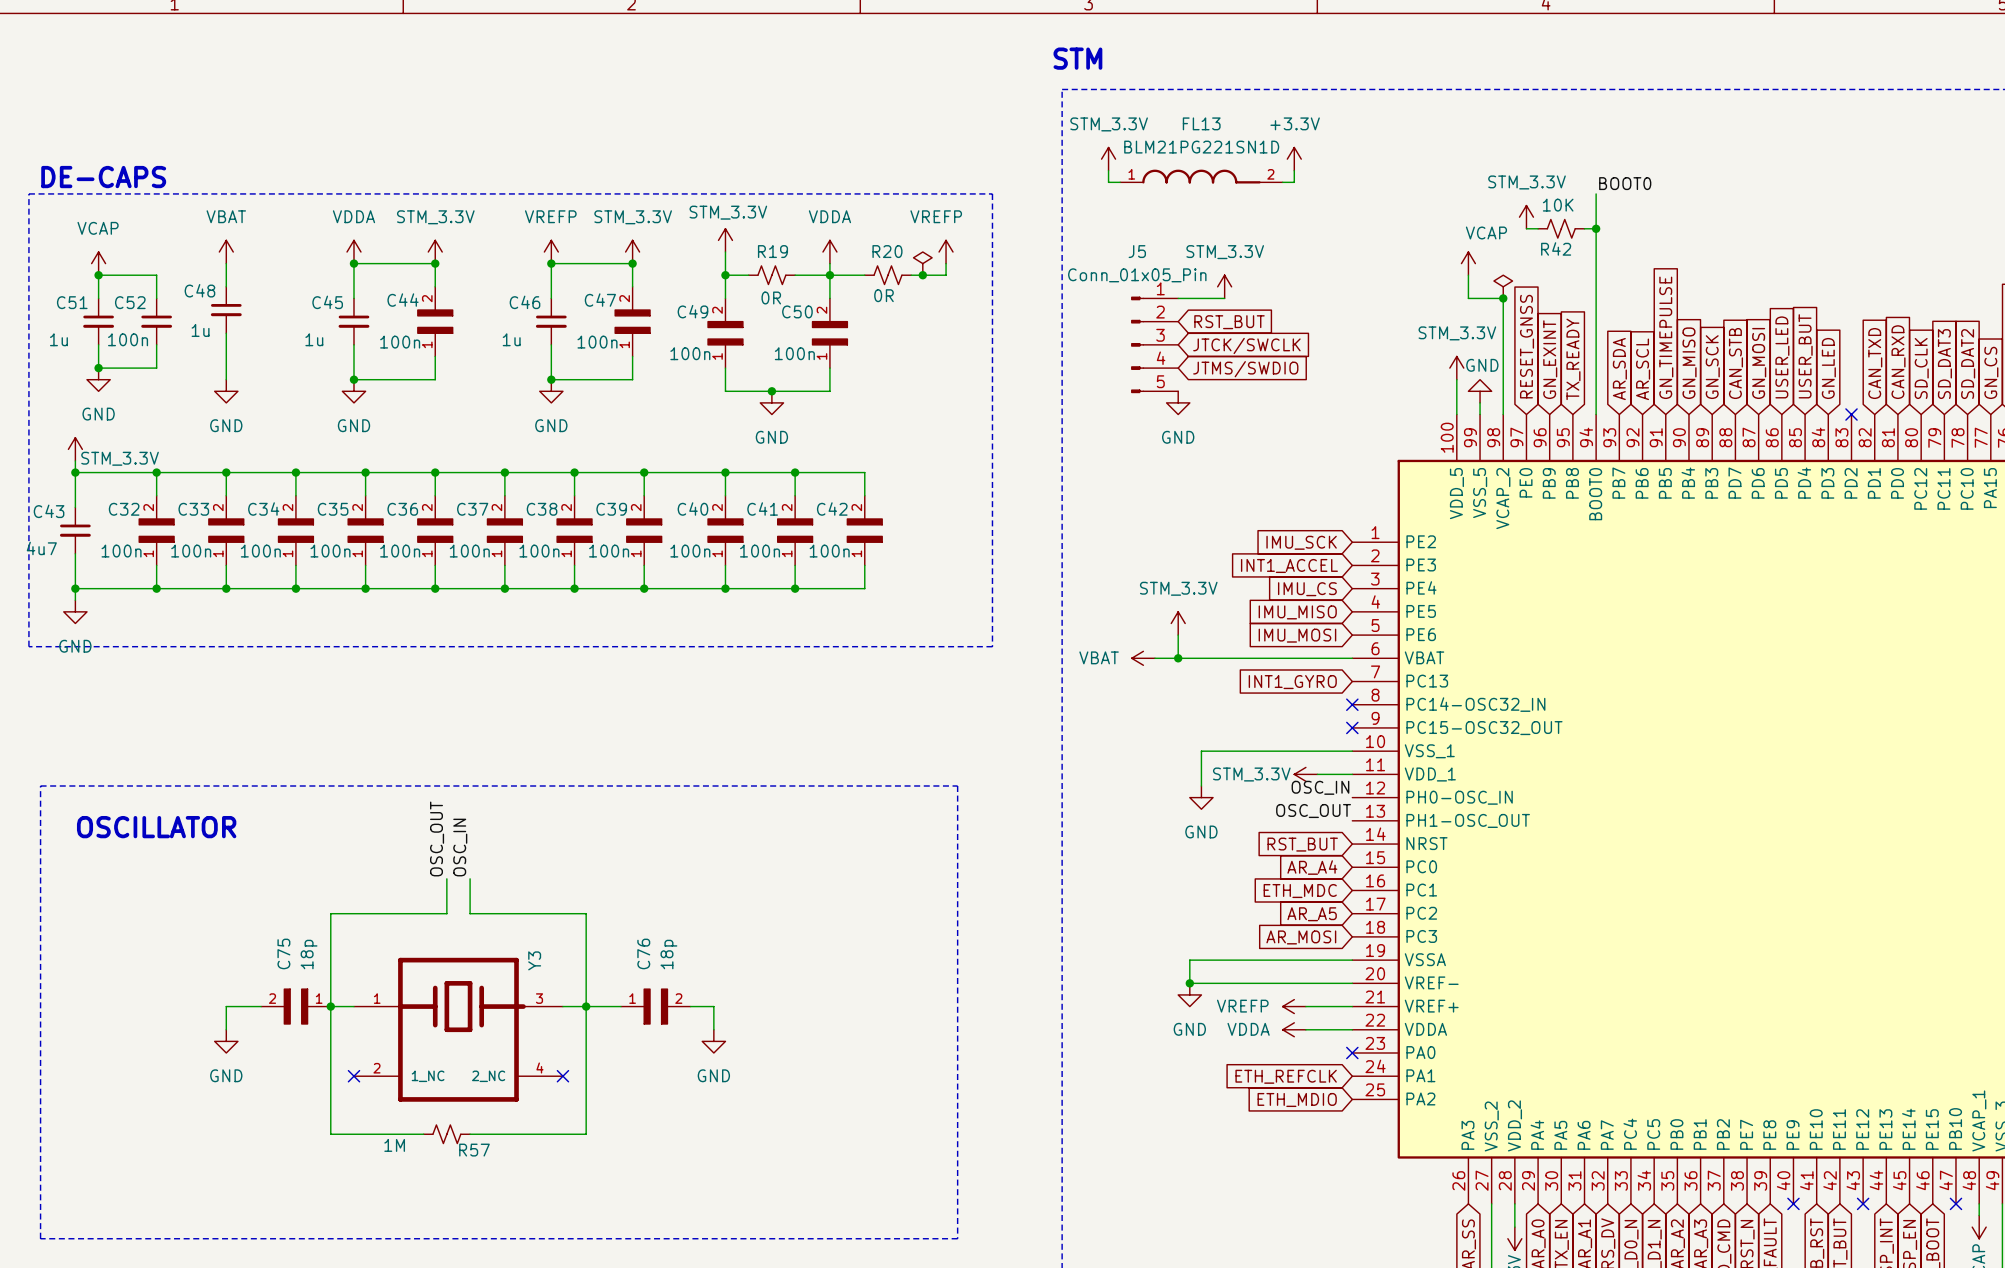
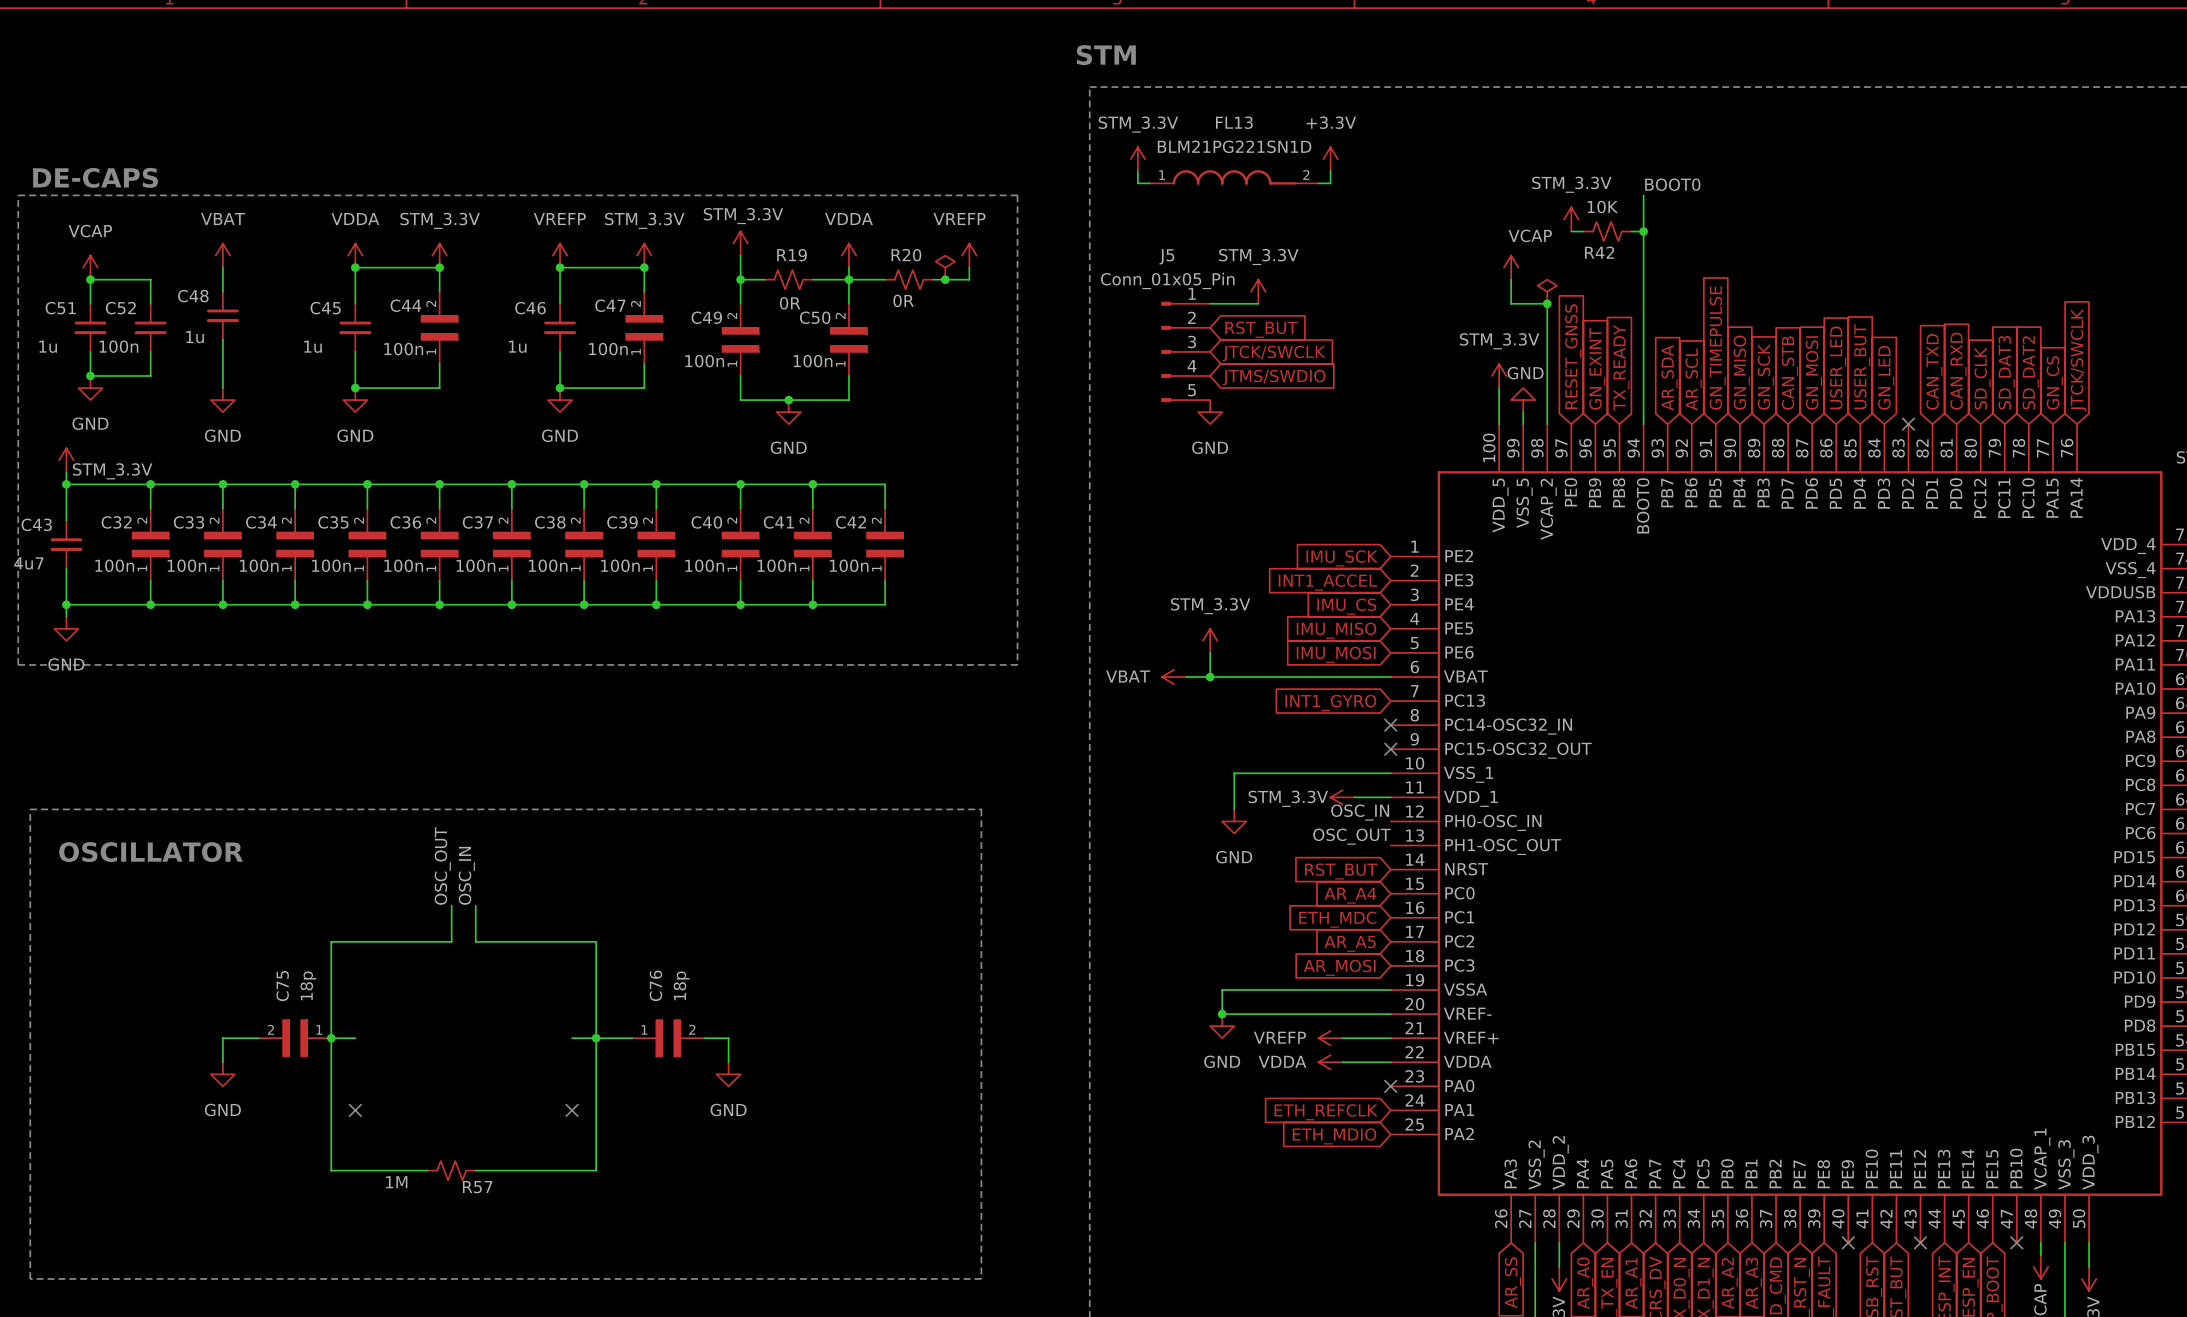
Y3: (458, 1029) -> none

